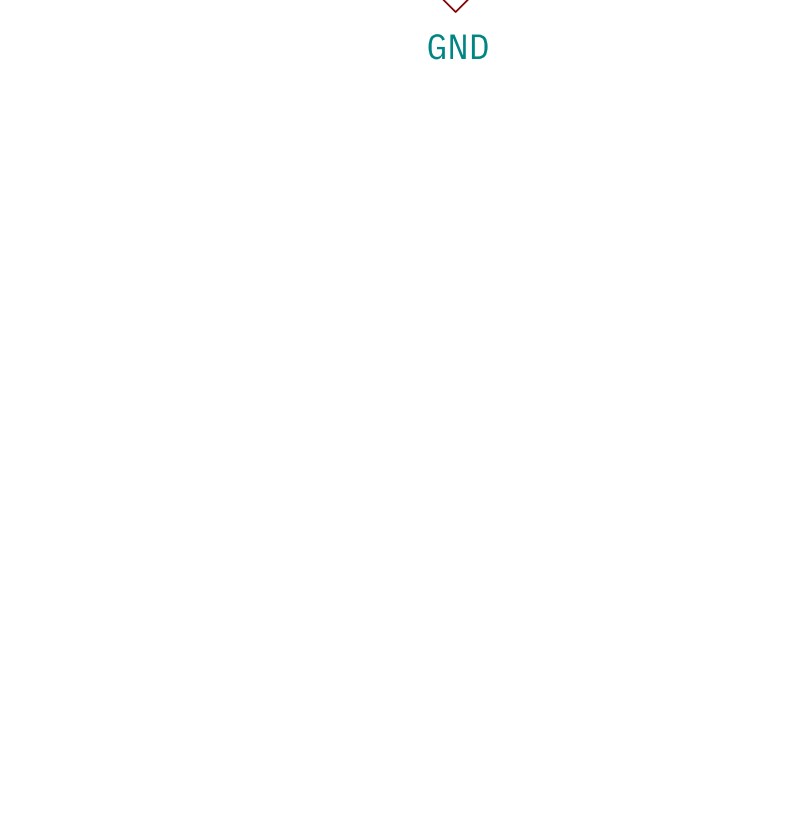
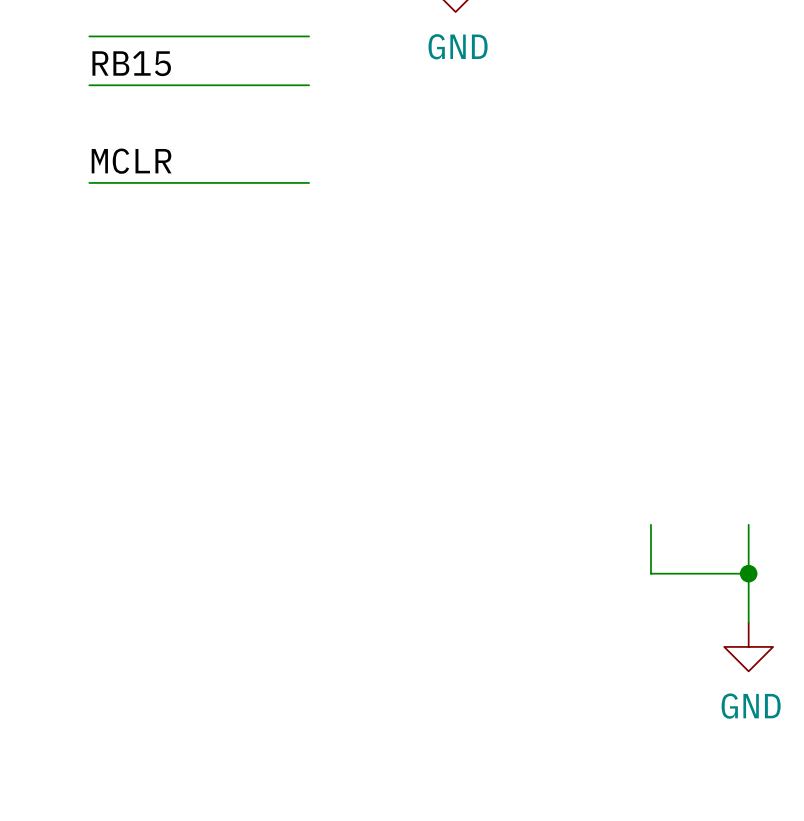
wire: none -> (89, 36) (309, 36)
label: none -> RB15 (131, 63)
wire: none -> (89, 85) (309, 85)
label: none -> MCLR (131, 161)
wire: none -> (89, 182) (309, 182)
wire: none -> (650, 524) (650, 573) (748, 573)
wire: none -> (748, 524) (748, 622)
junction: none -> (748, 573)
power symbol: none -> GND (748, 646)

